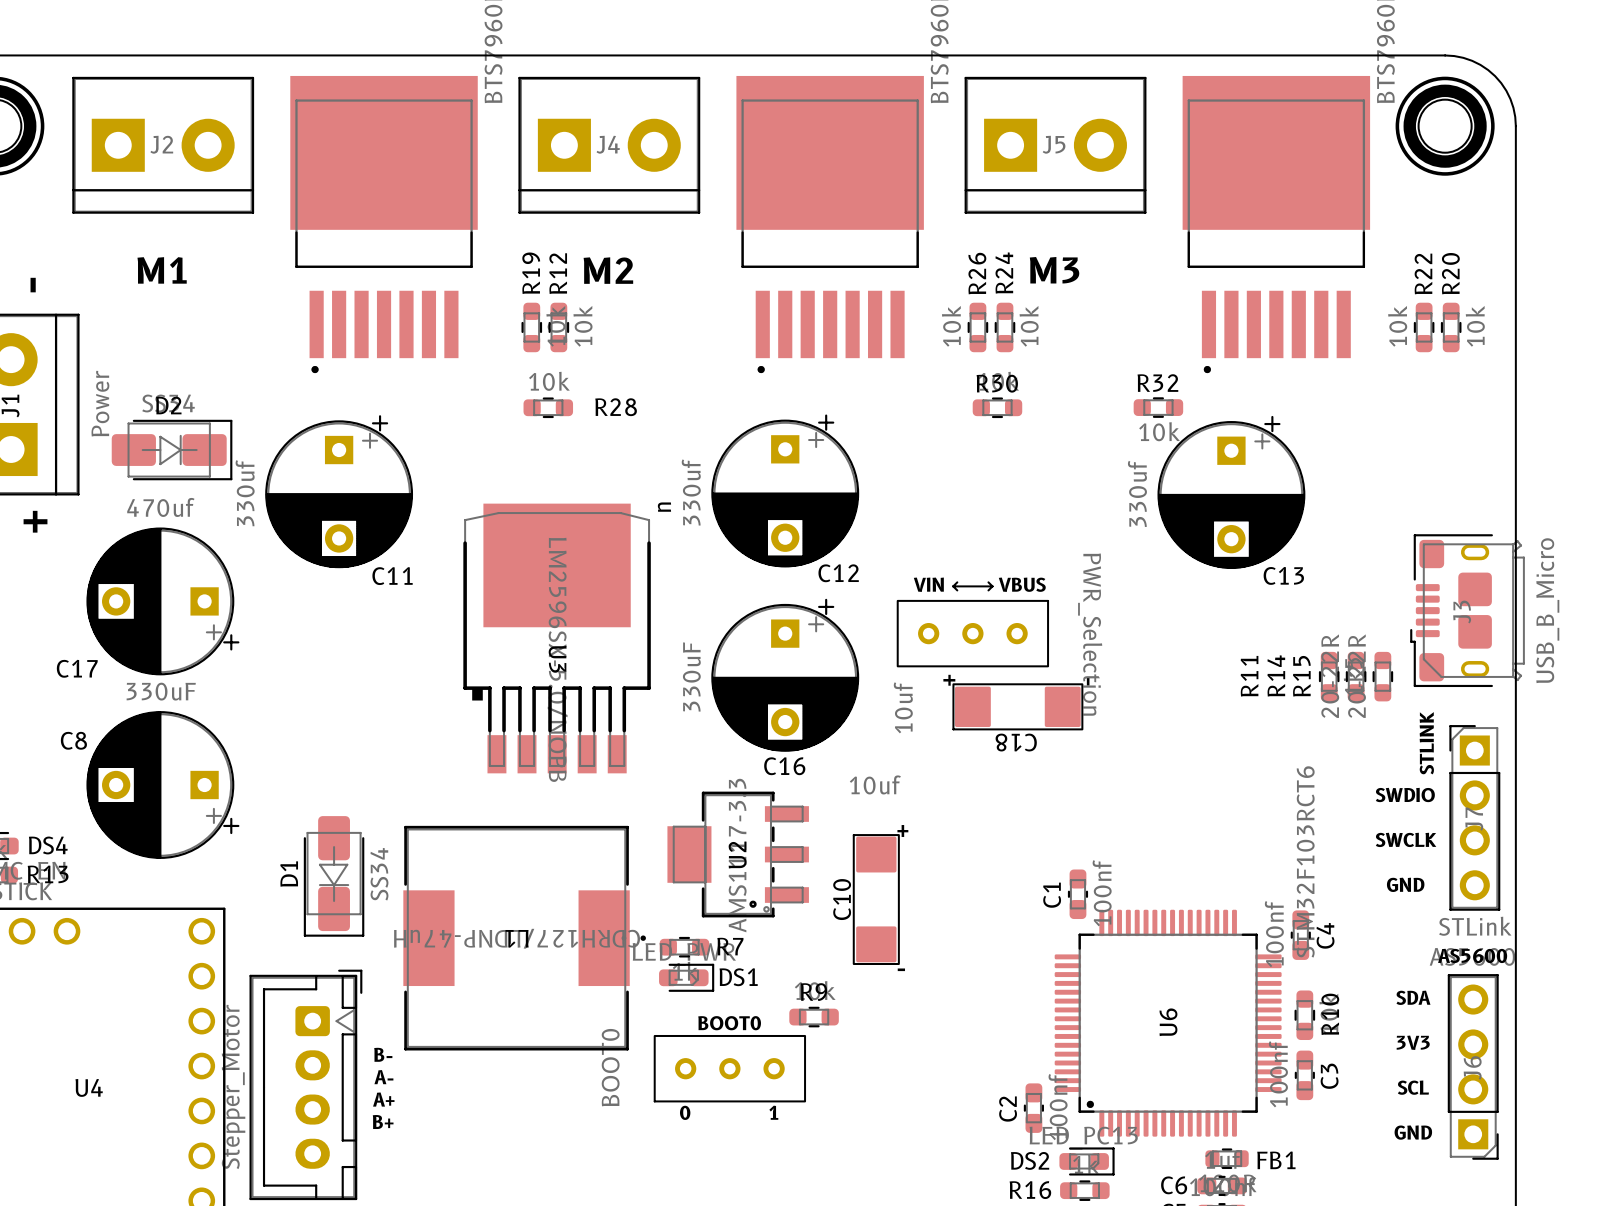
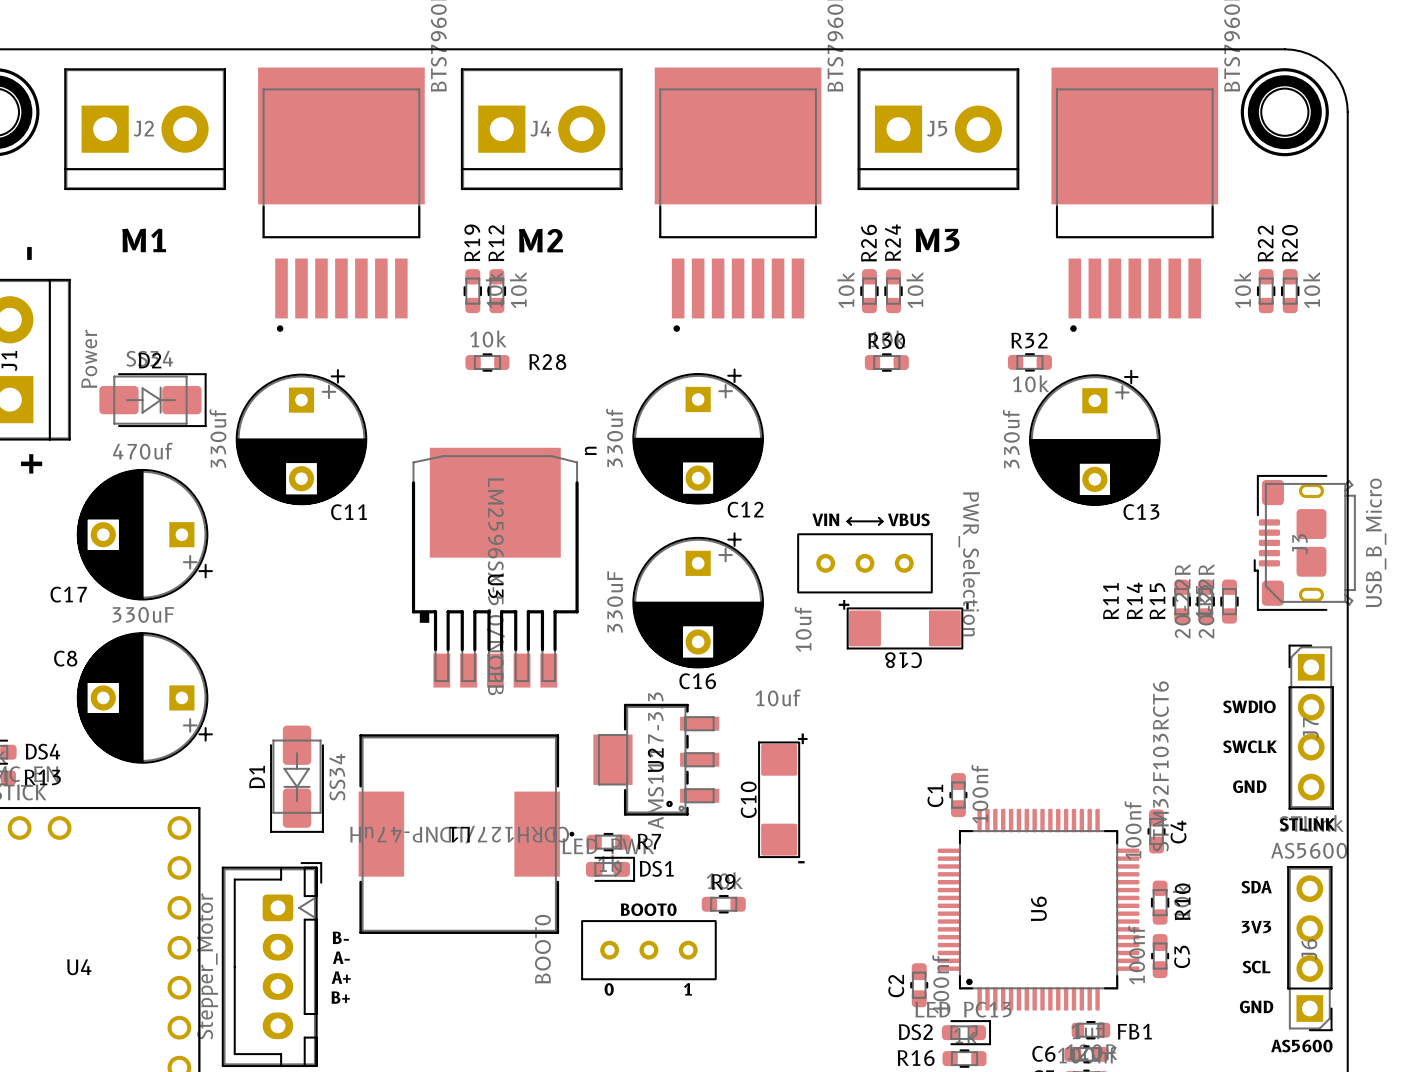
text rotation: 0° (1426, 743) -> 90° clockwise (1307, 824)
text position: STLINK (1426, 743) -> STLINK (1307, 824)
text position: AS5600 (1472, 955) -> AS5600 (1301, 1046)

